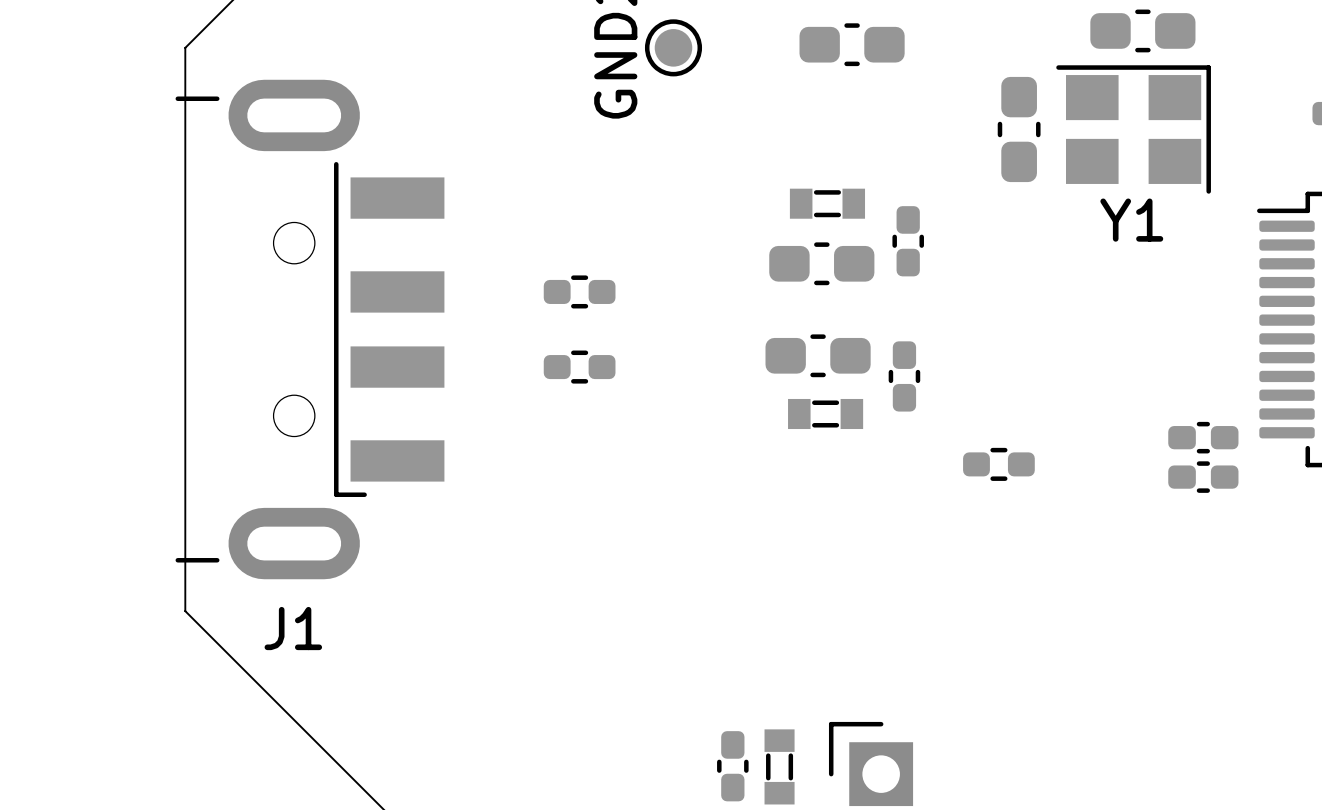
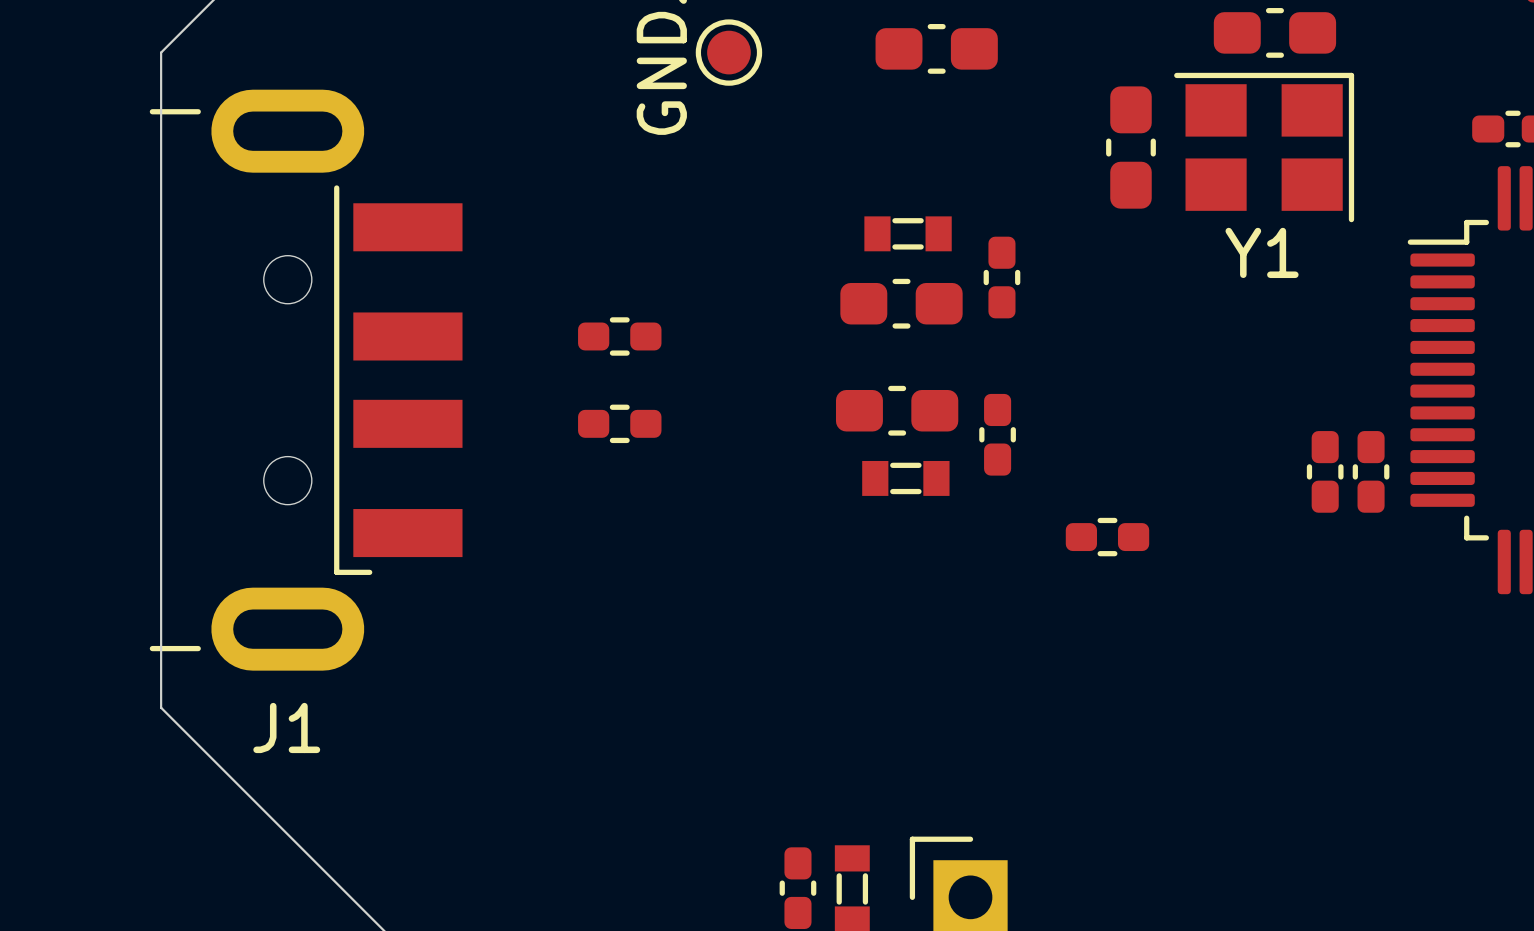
part: none -> (1325, 471)
part: none -> (1371, 471)
part: (1203, 437) -> none
part: (1203, 477) -> none

